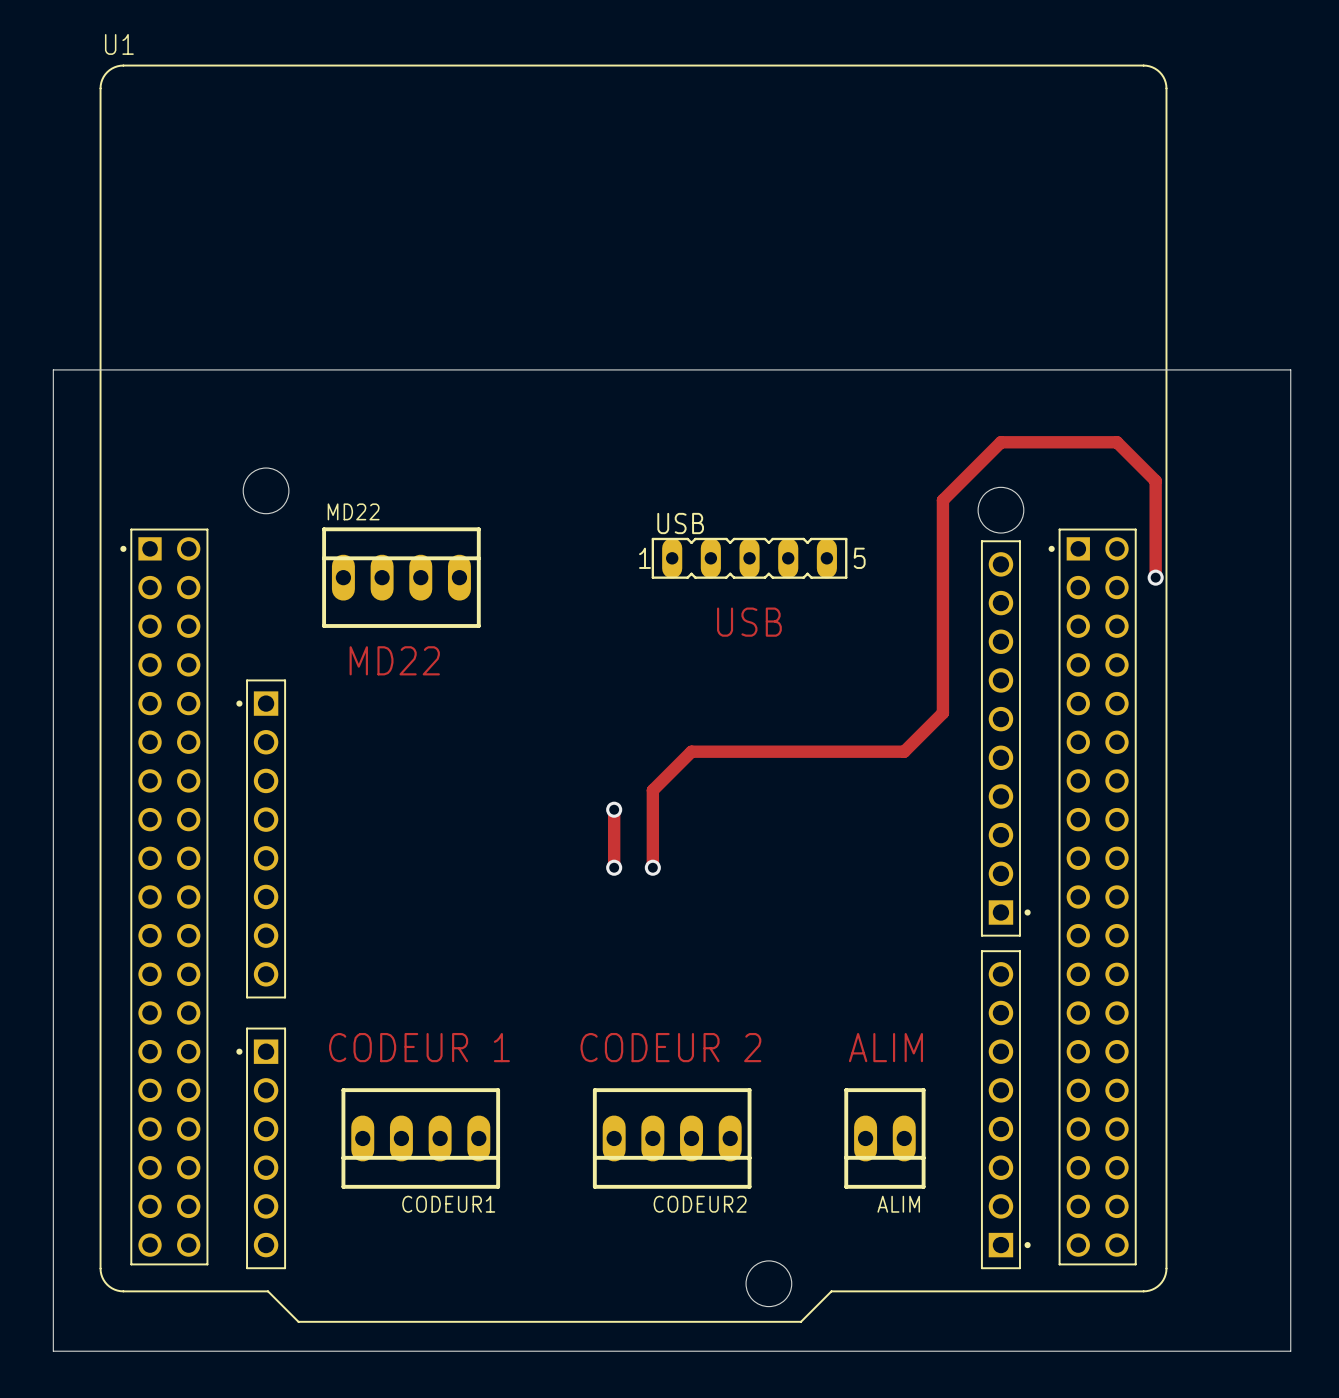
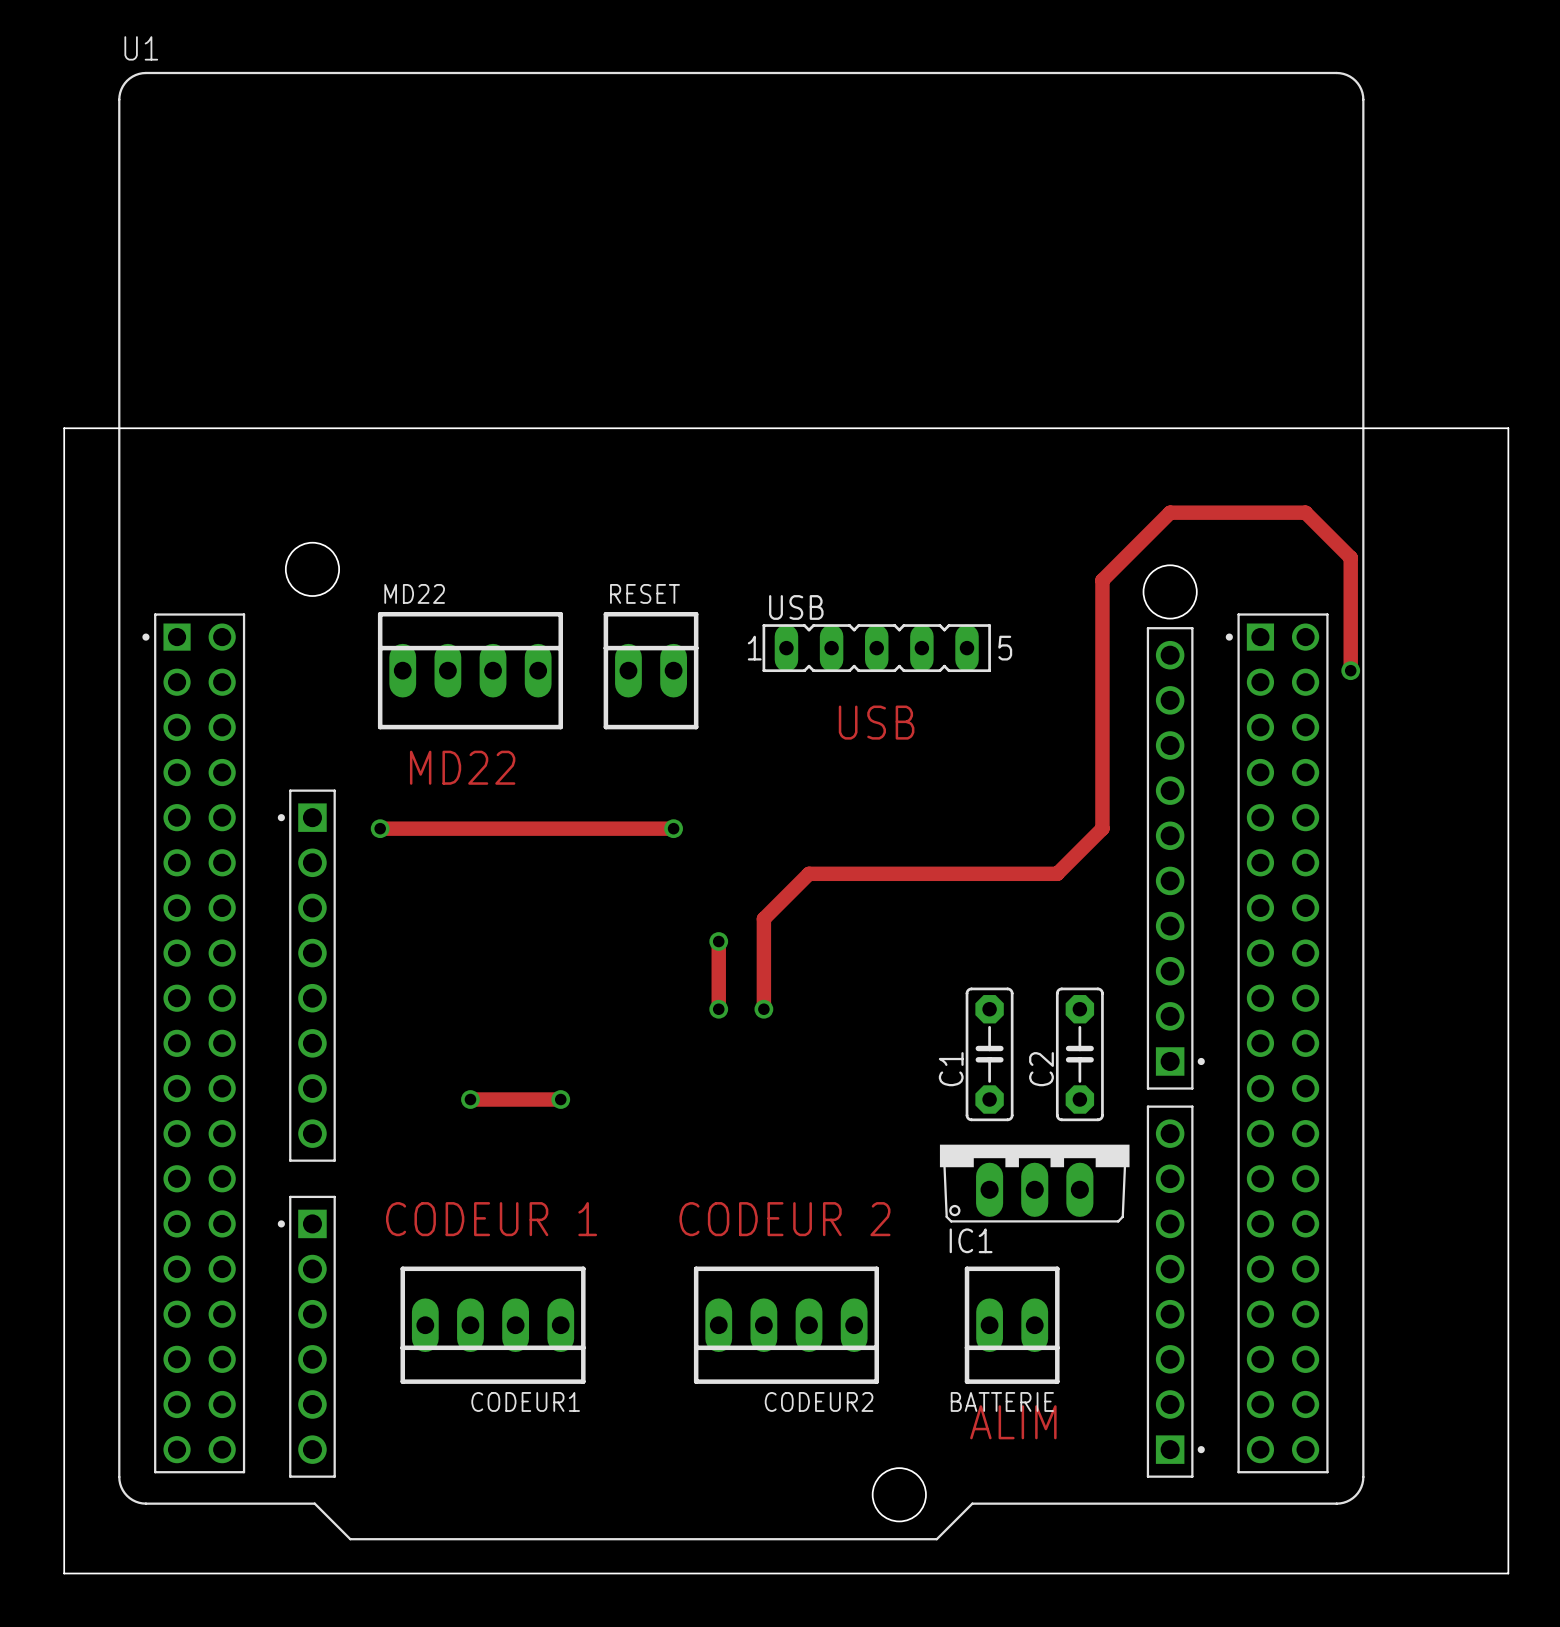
RESET: none -> (651, 670)
track: none -> (380, 828) (673, 828)
via: none -> (380, 828)
via: none -> (673, 828)
C1: none -> (989, 1054)
C2: none -> (1079, 1054)
track: none -> (470, 1099) (560, 1099)
via: none -> (470, 1099)
via: none -> (560, 1099)
IC1: none -> (1034, 1183)
text position: ALIM (885, 1047) -> ALIM (1013, 1422)
BATTERIE: none -> (1012, 1325)
ALIM: (884, 1138) -> none

